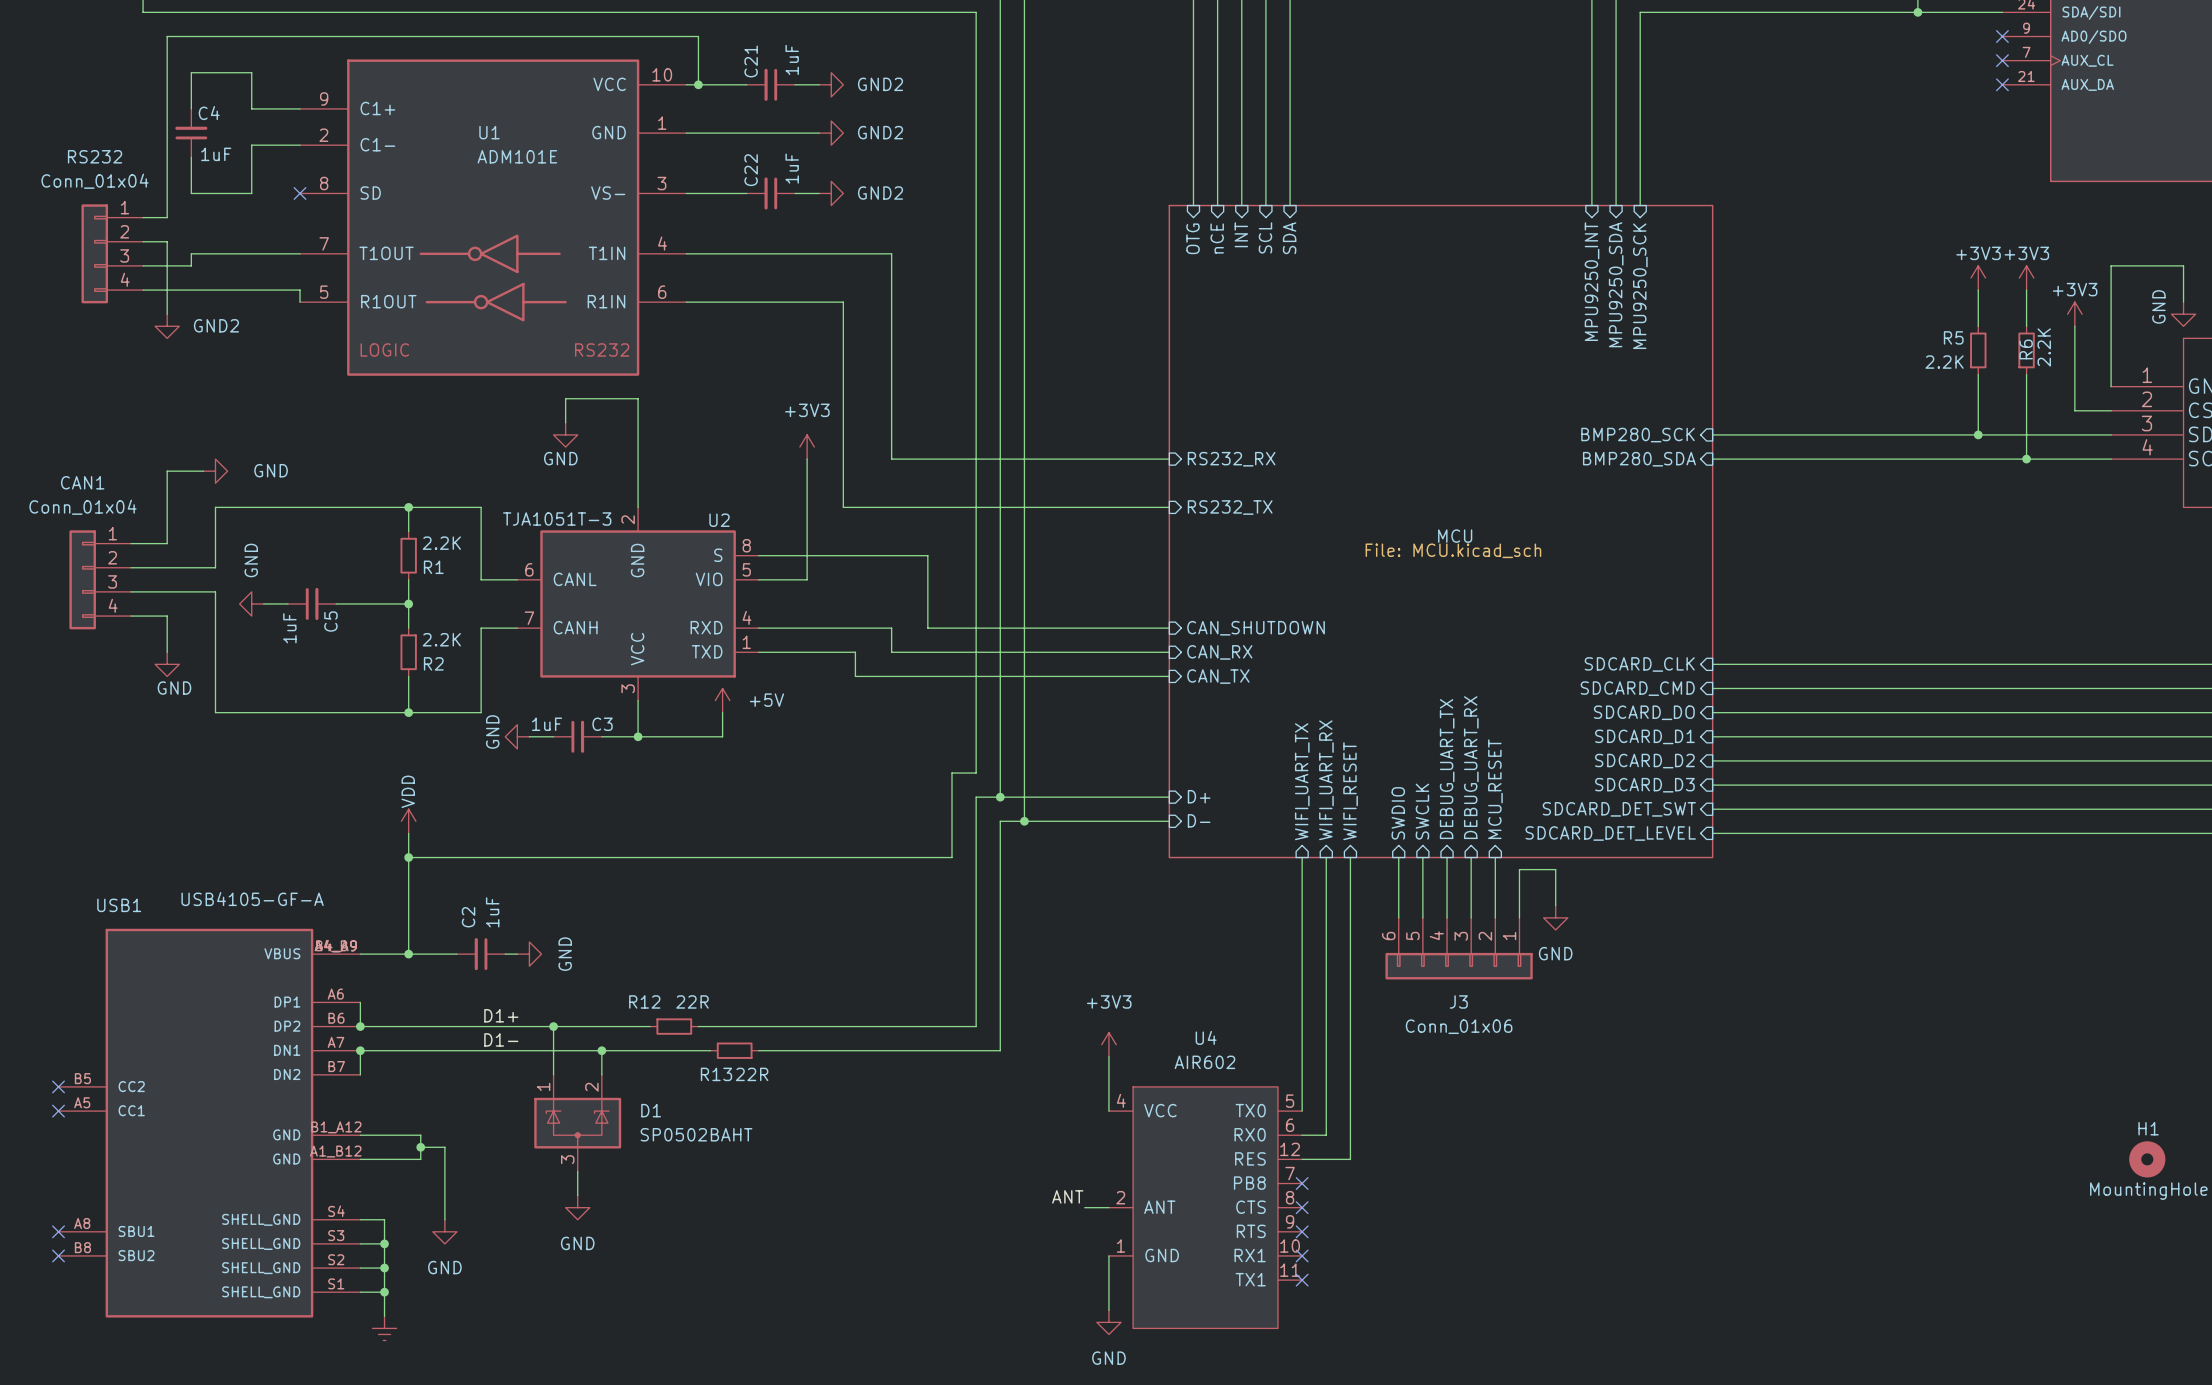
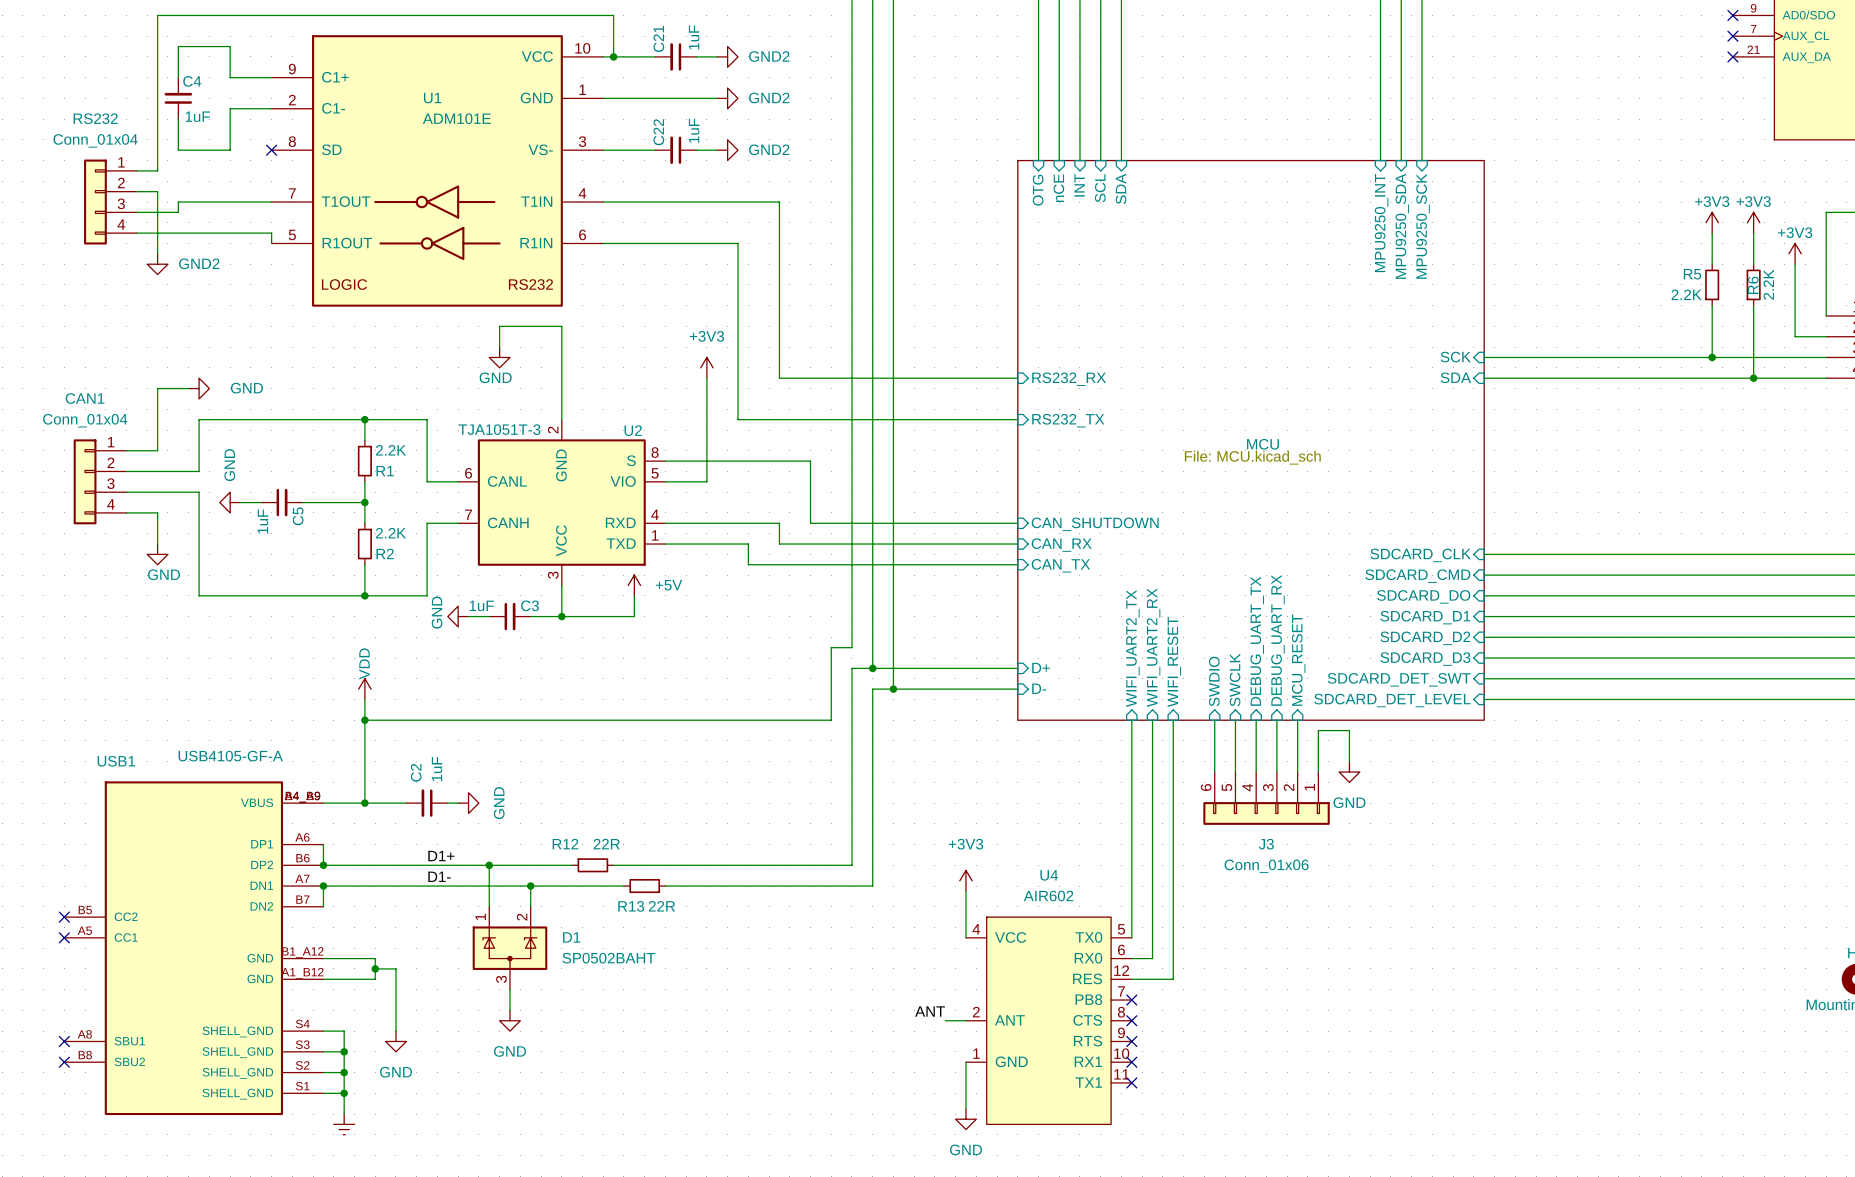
sheet pin: BMP280_SCK (1638, 435) -> SCK (1455, 357)
sheet pin: BMP280_SDA (1639, 459) -> SDA (1455, 377)
sheet pin: WIFI_UART_RX (1326, 780) -> WIFI_UART2_RX (1153, 647)
sheet pin: WIFI_UART_TX (1302, 781) -> WIFI_UART2_TX (1132, 648)

